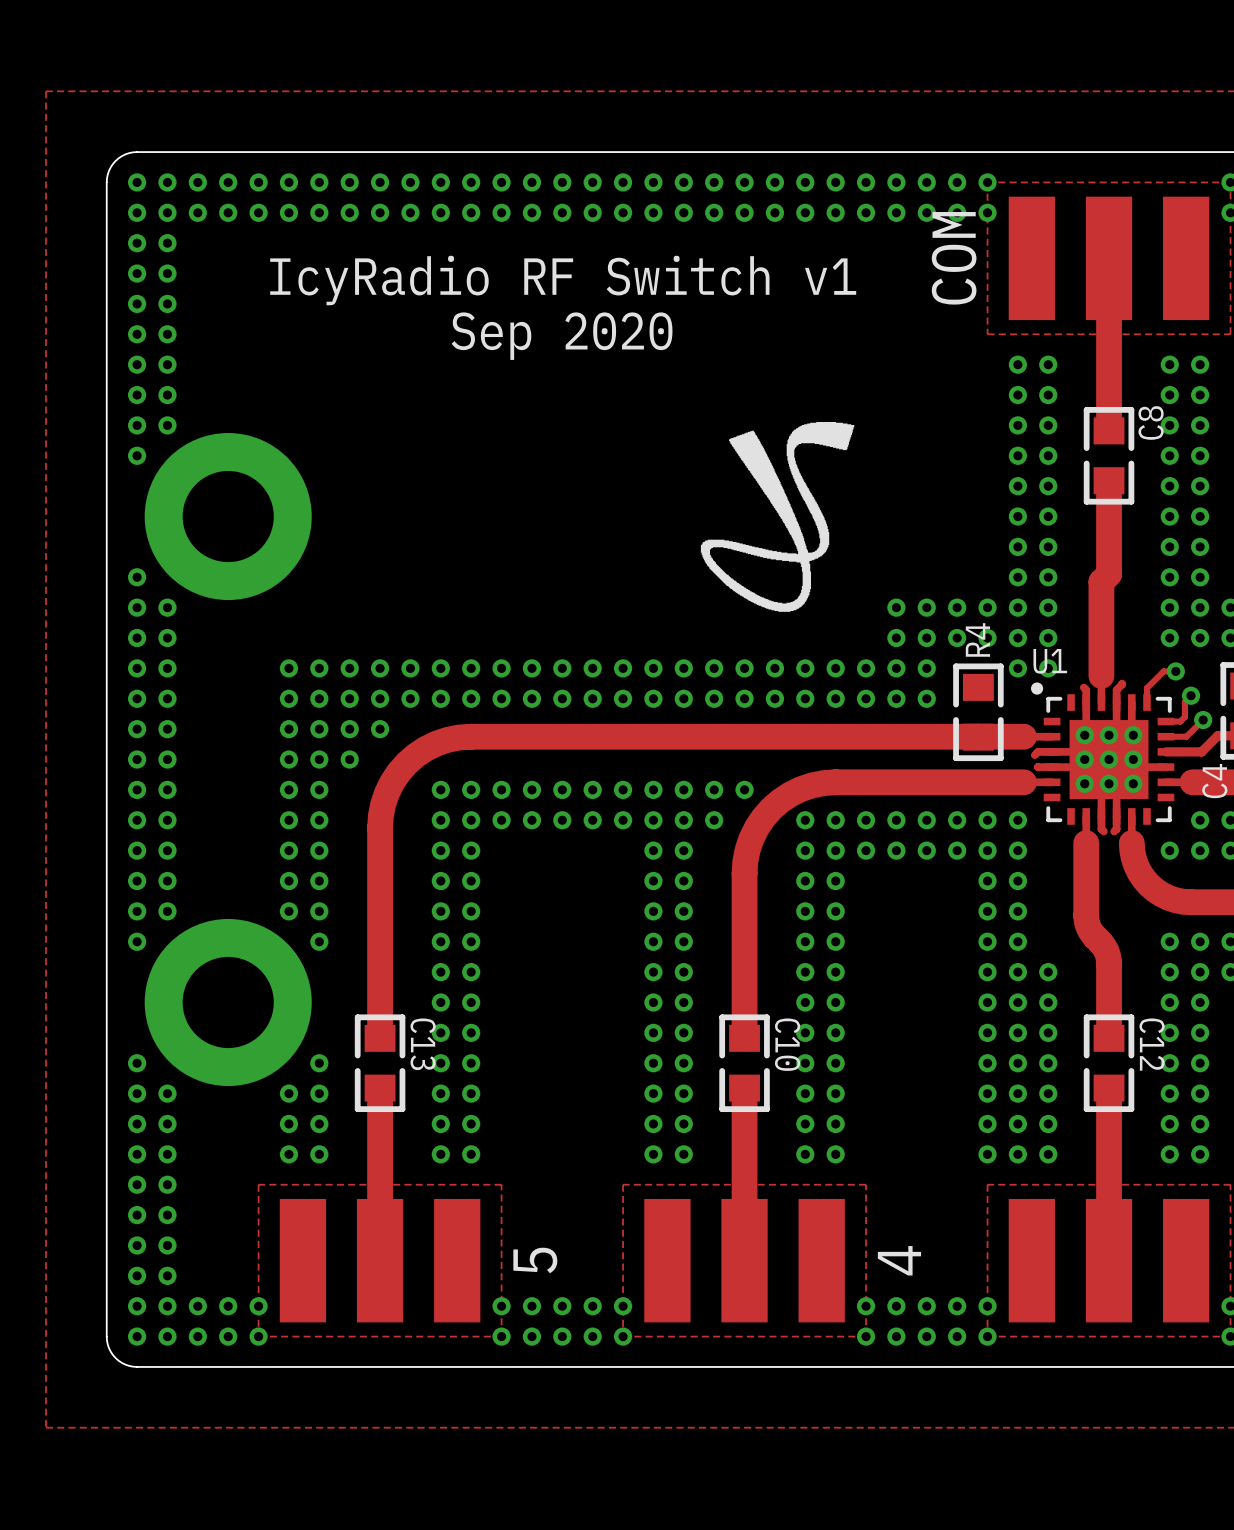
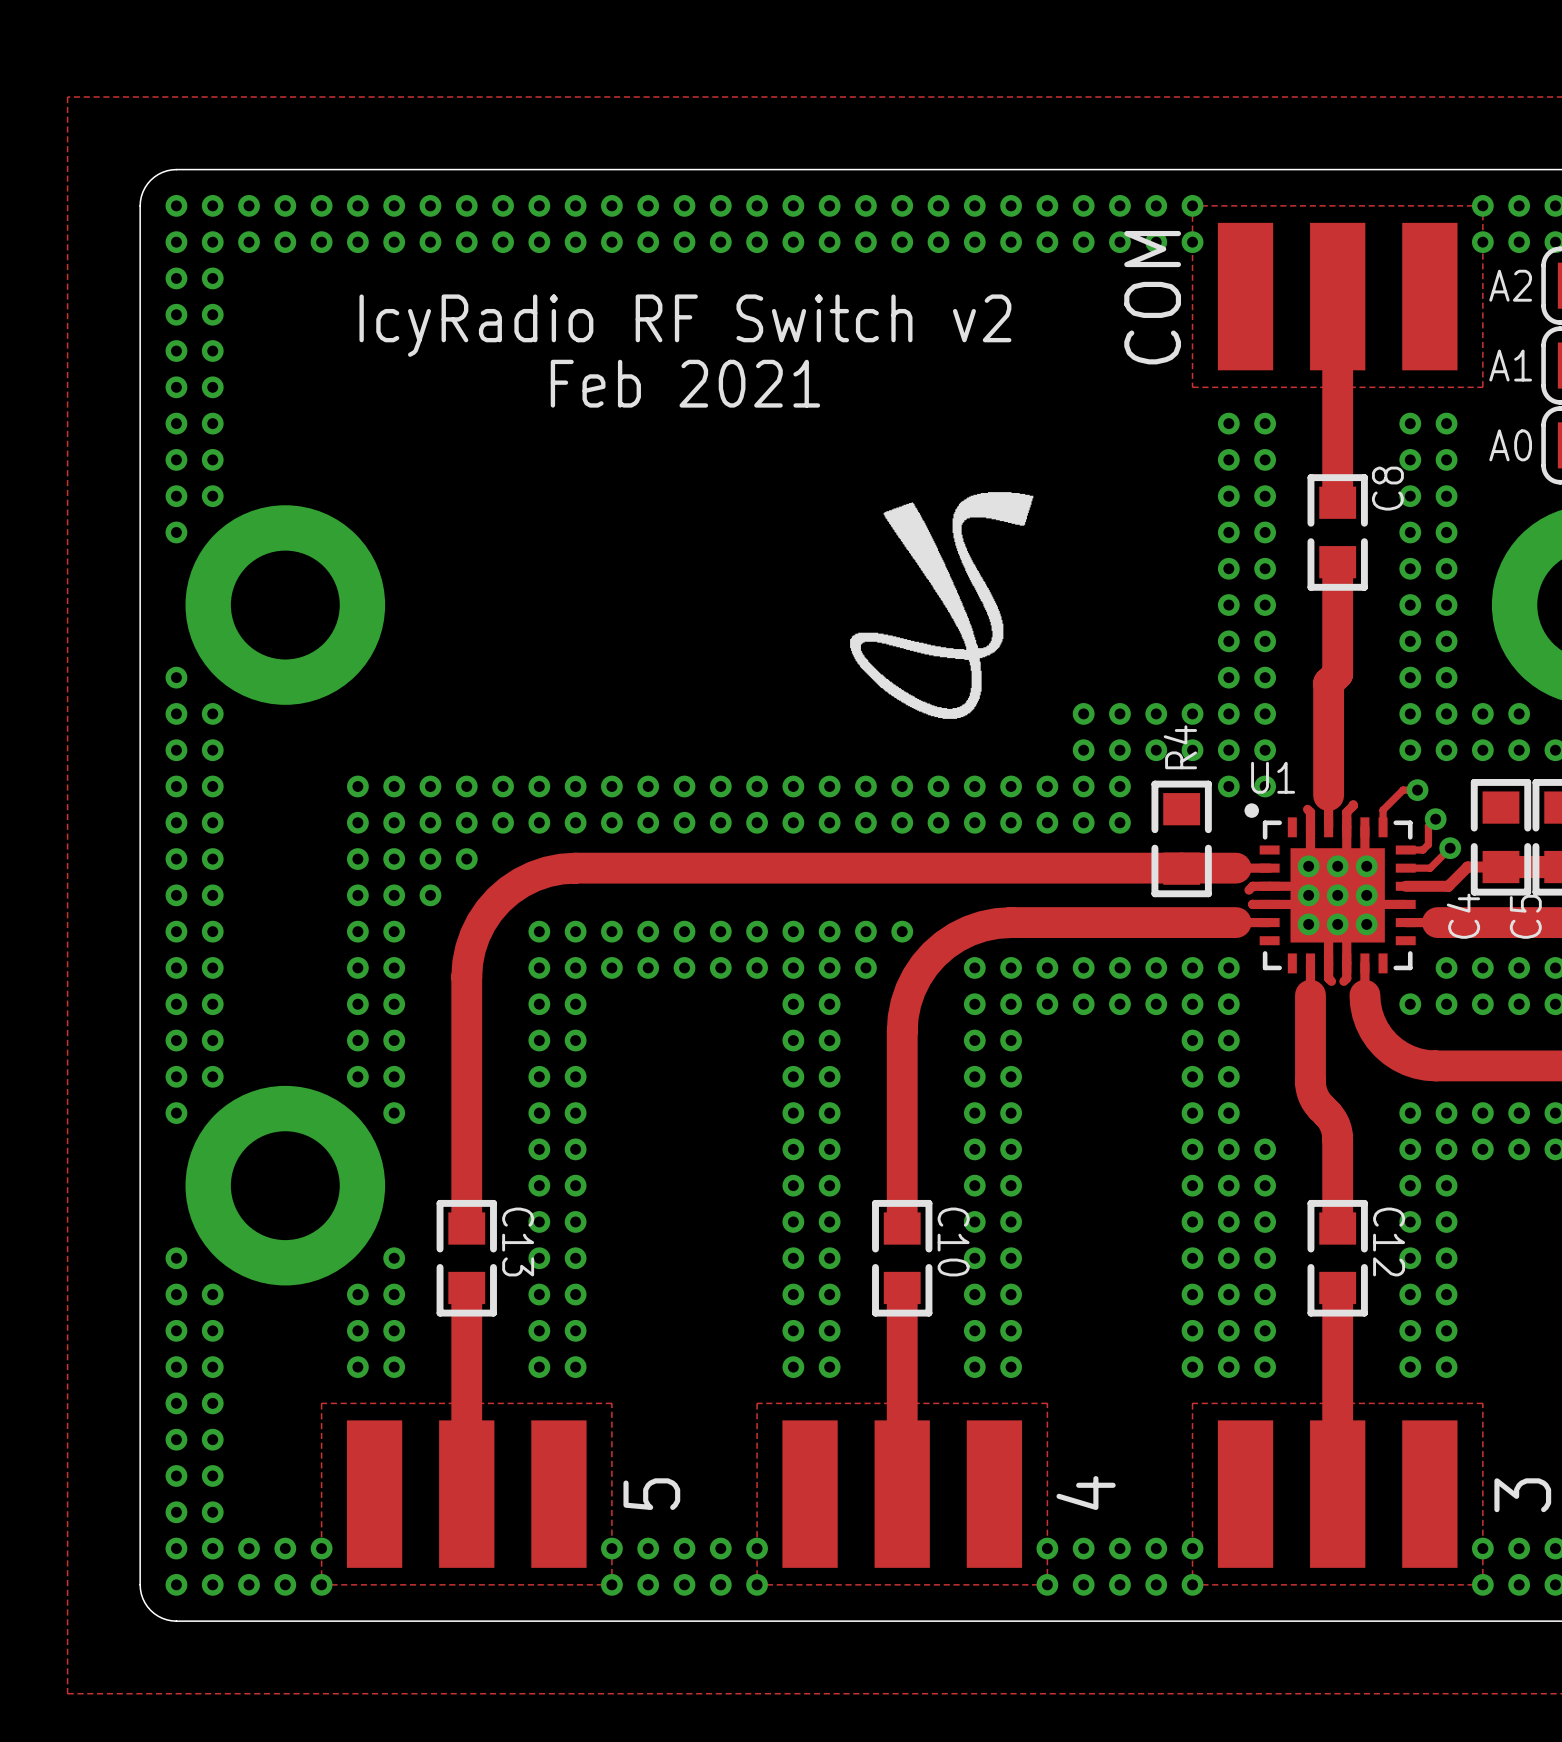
text: IcyRadio RF Switch v1 (563, 280) -> IcyRadio RF Switch v2 (685, 325)
text: Sep 2020 (562, 336) -> Feb 2021 (685, 383)

